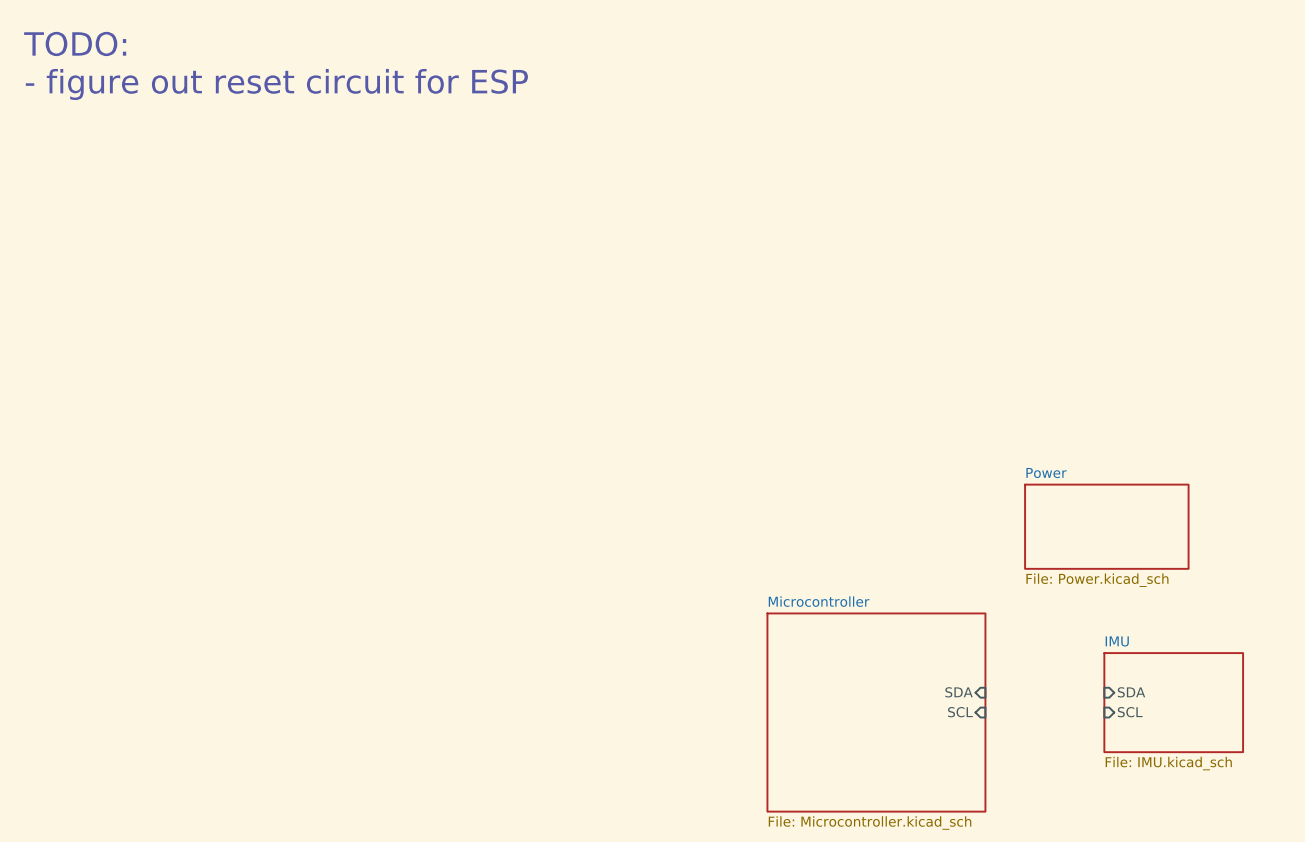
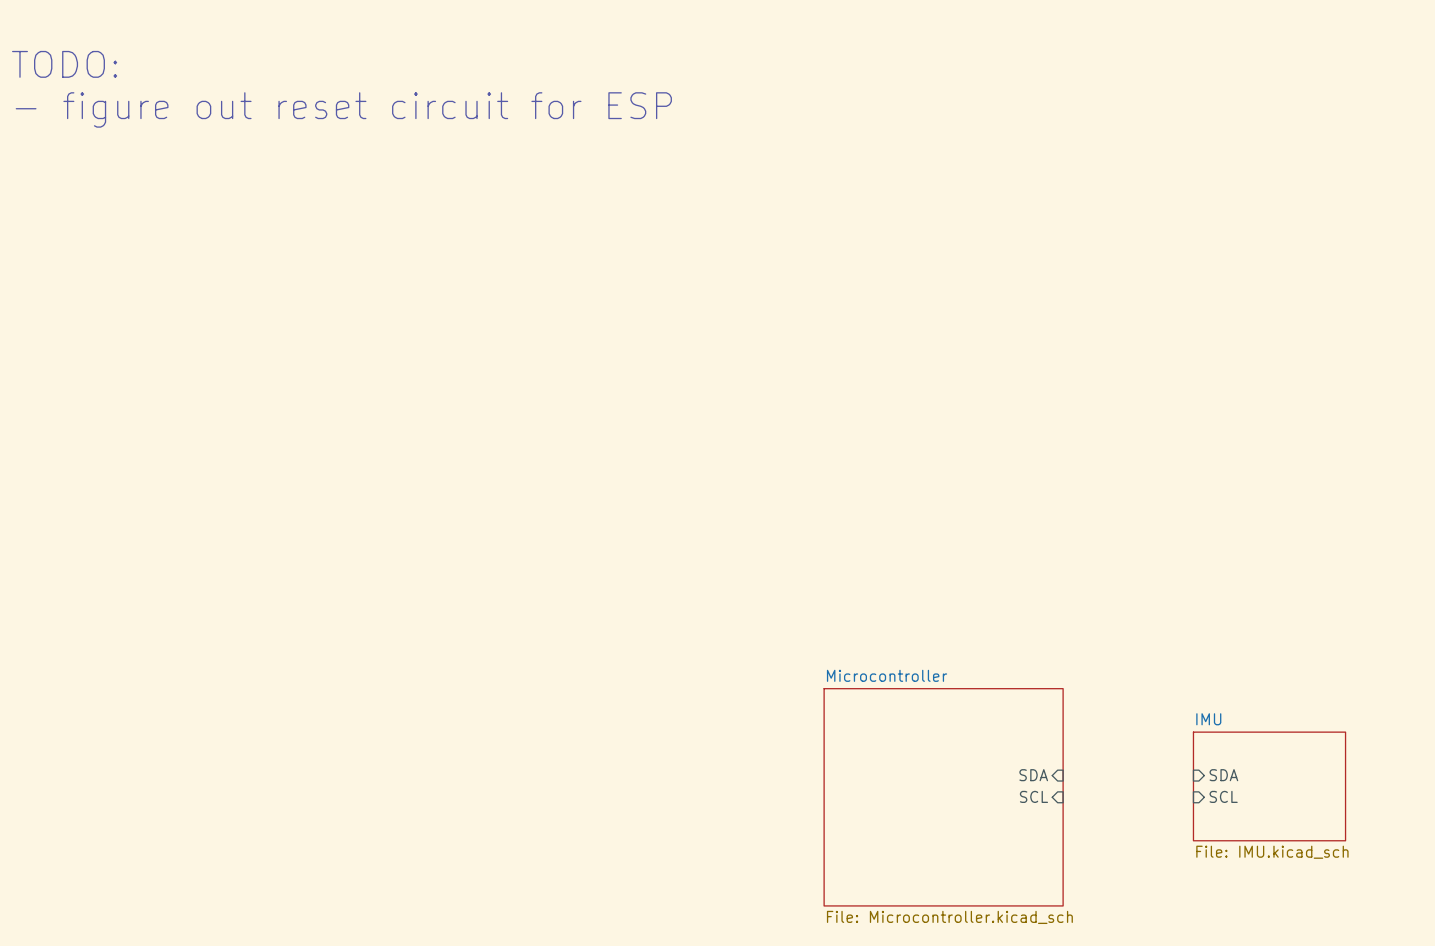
sheet Power: File: Power.kicad_sch (1106, 526) -> none

